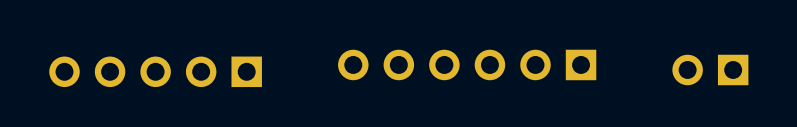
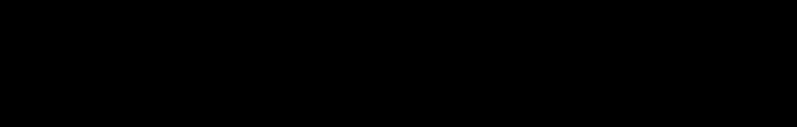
part: (467, 64) -> none
part: (710, 69) -> none
part: (155, 71) -> none

